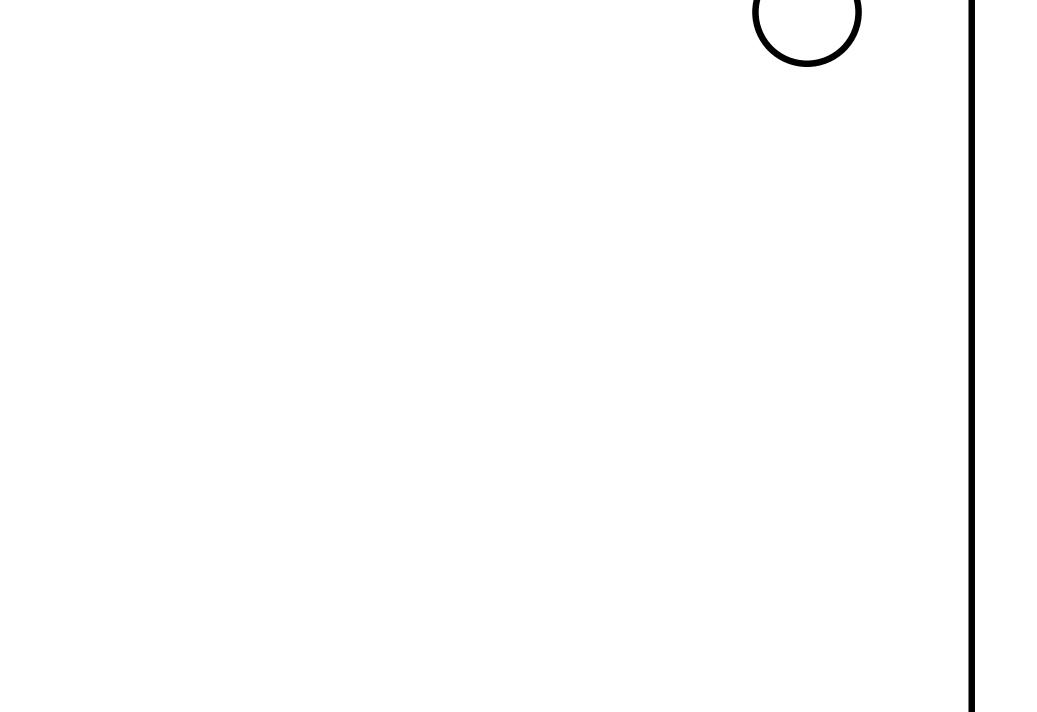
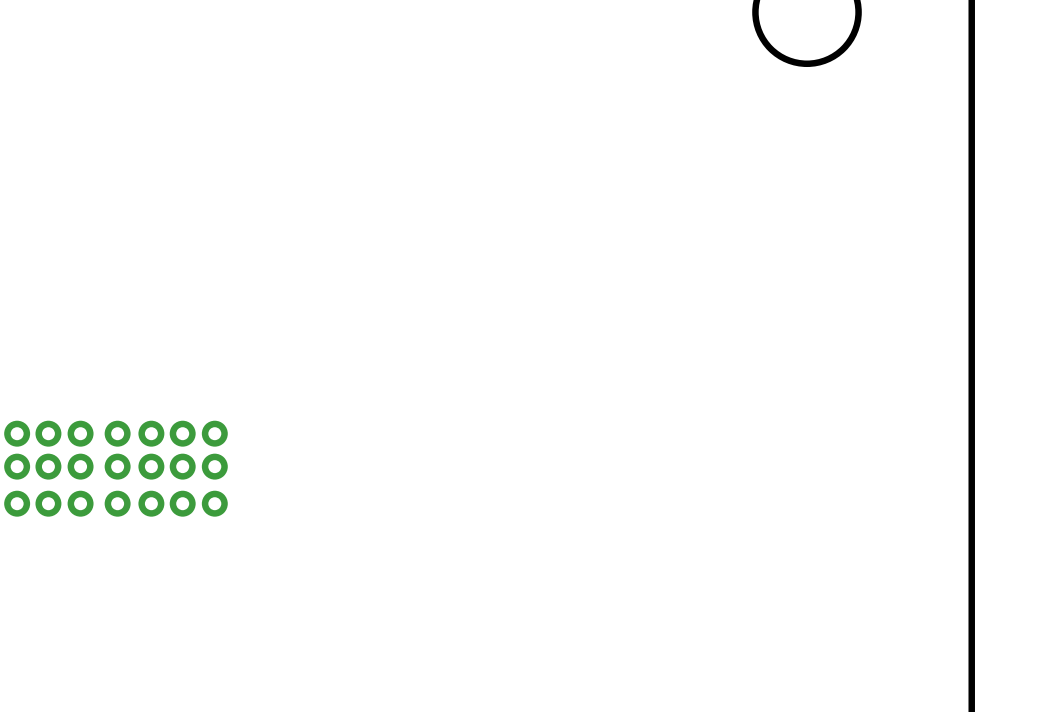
via: none -> (17, 433)
via: none -> (48, 433)
via: none -> (80, 433)
via: none -> (117, 433)
via: none -> (151, 433)
via: none -> (182, 433)
via: none -> (214, 433)
via: none -> (17, 466)
via: none -> (48, 466)
via: none -> (80, 466)
via: none -> (117, 466)
via: none -> (151, 466)
via: none -> (182, 466)
via: none -> (214, 466)
via: none -> (17, 503)
via: none -> (48, 503)
via: none -> (80, 503)
via: none -> (117, 503)
via: none -> (151, 503)
via: none -> (182, 503)
via: none -> (214, 503)

